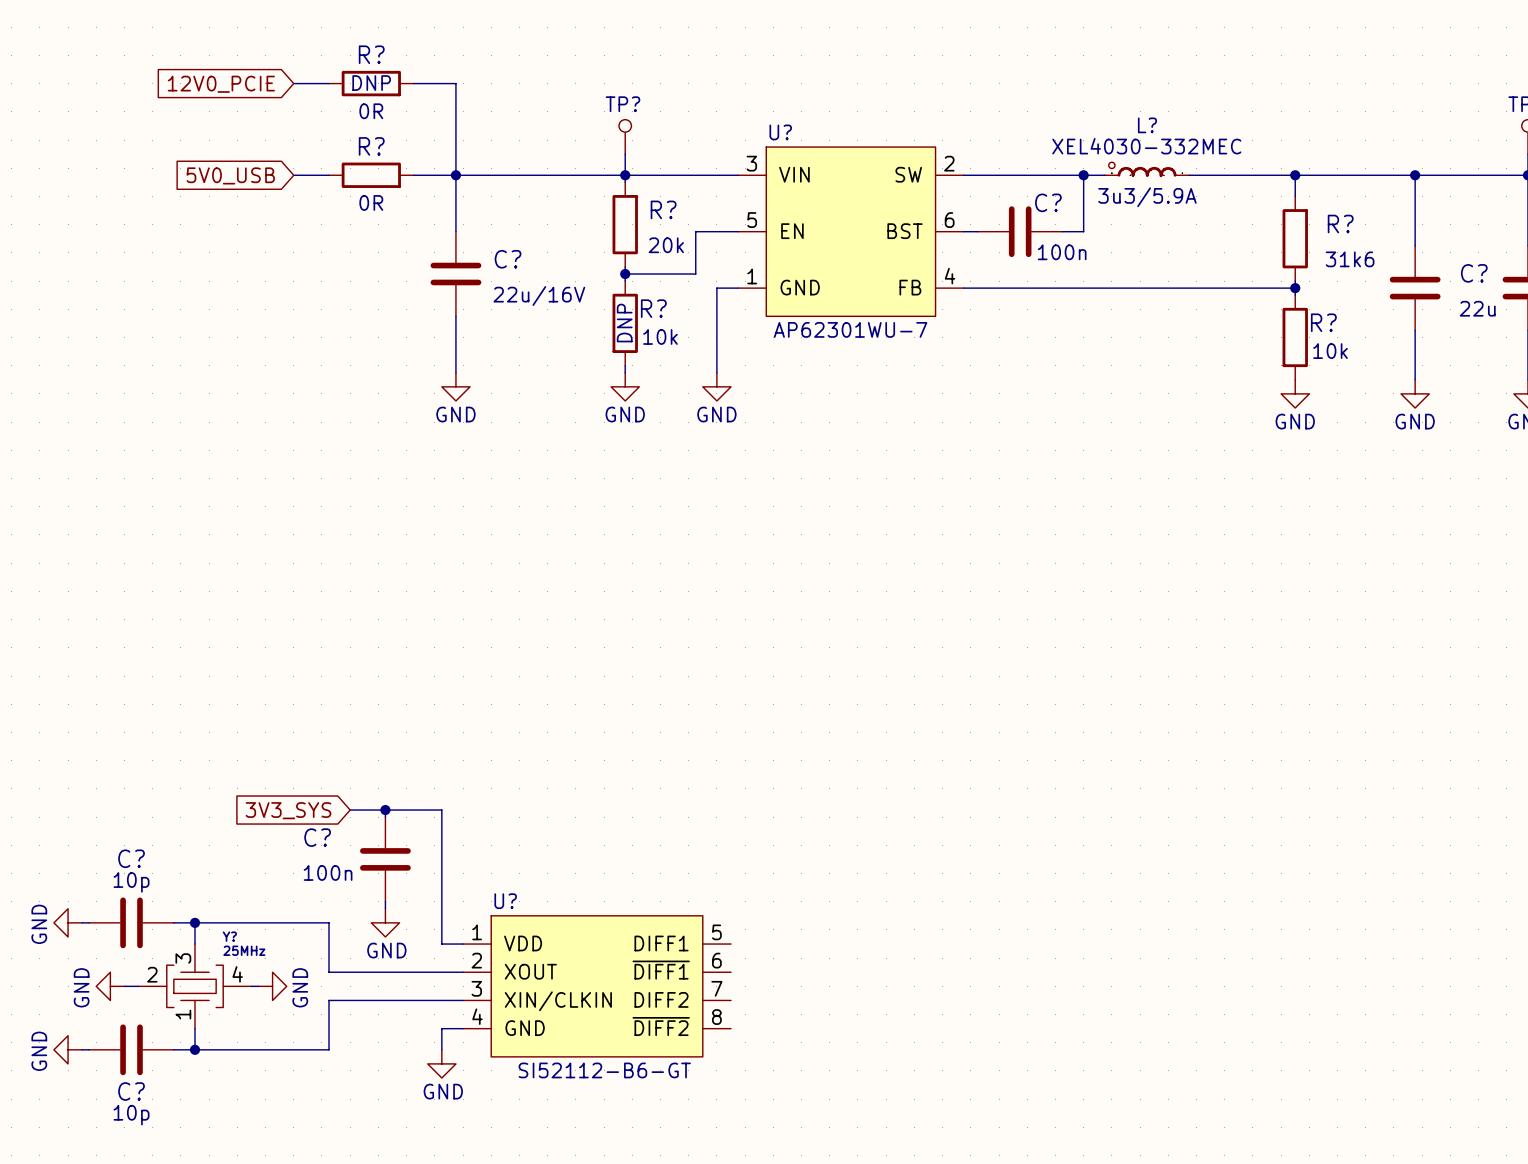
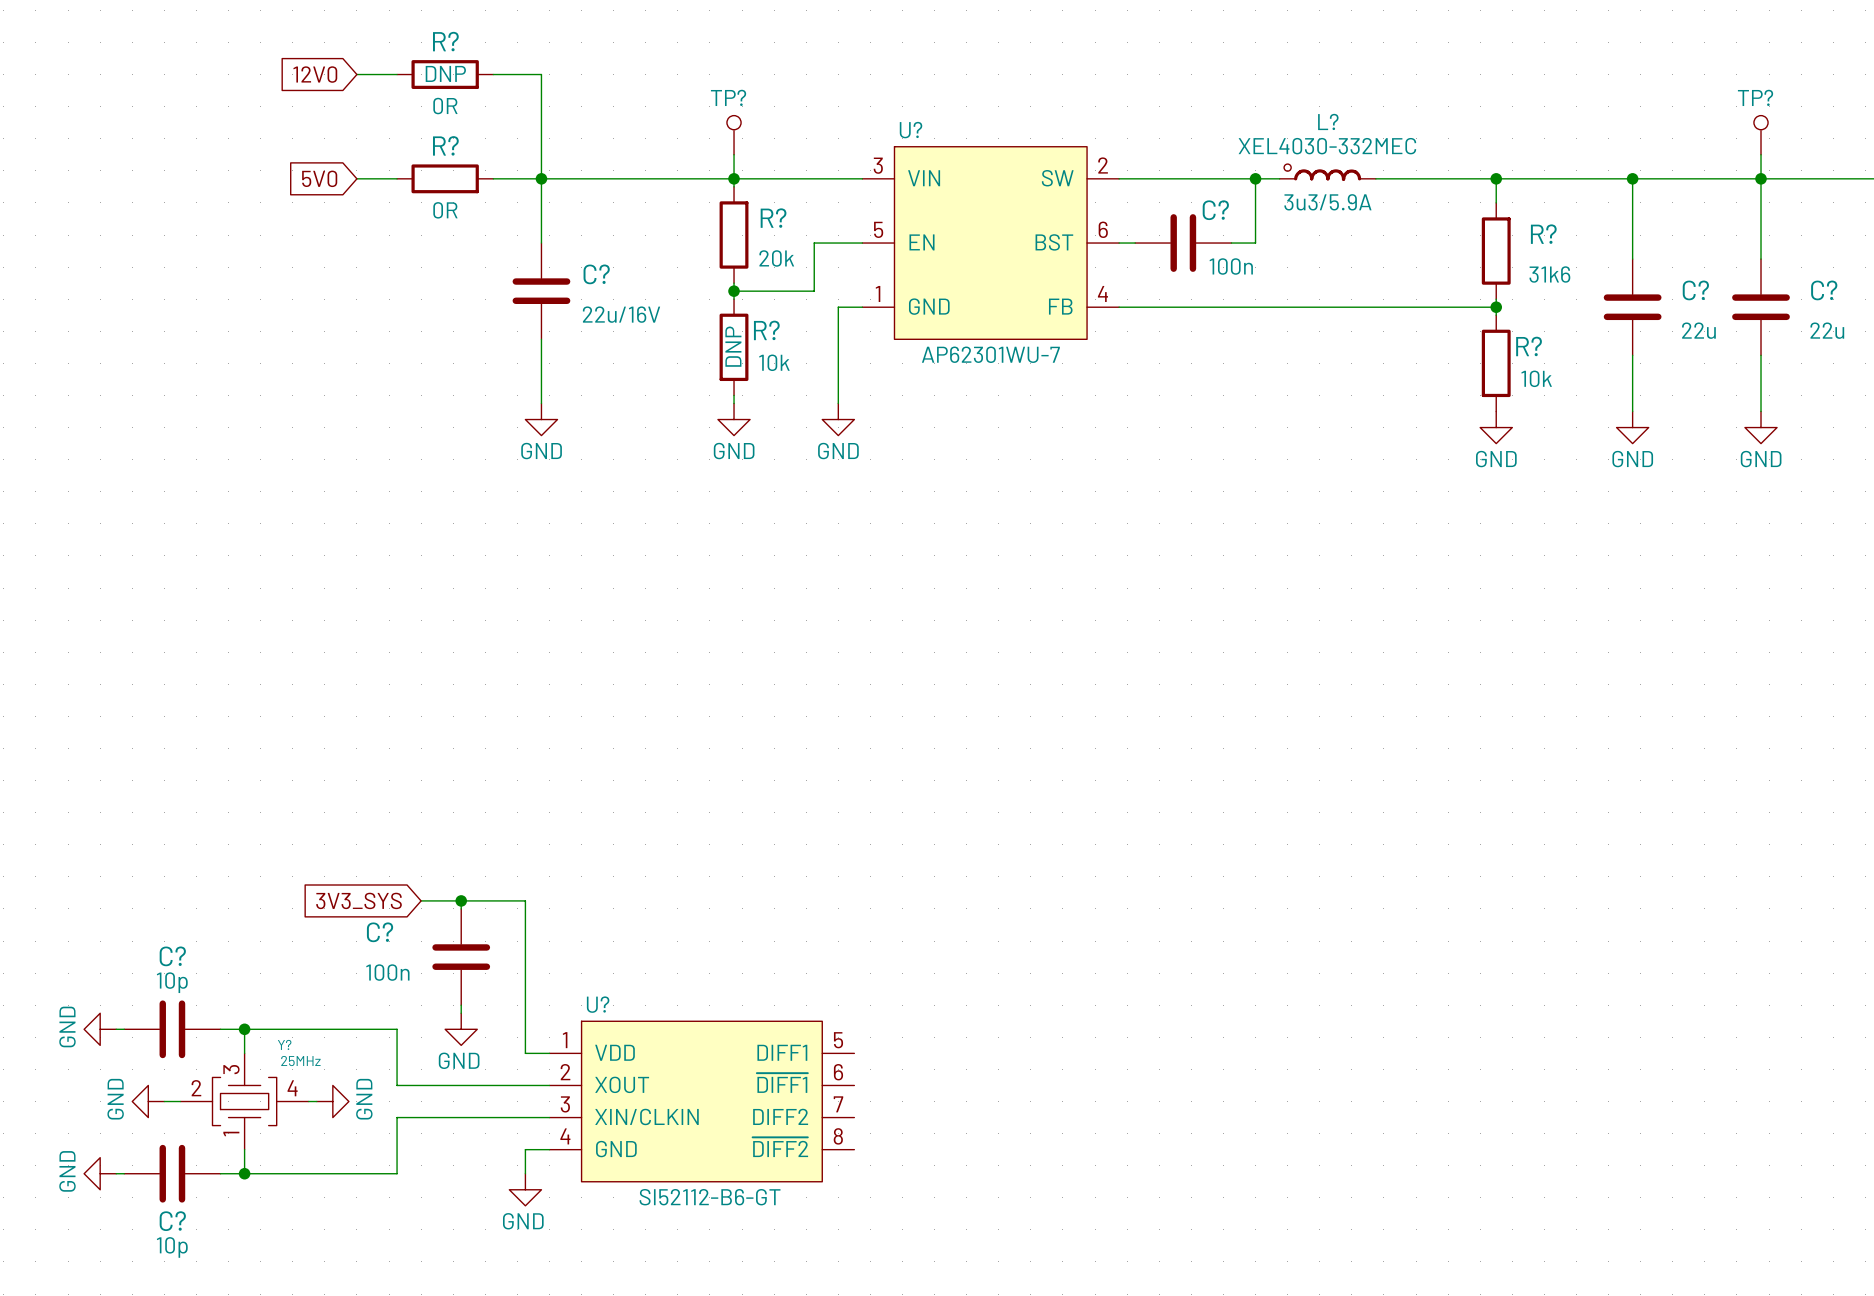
global label: 12V0_PCIE (221, 84) -> 12V0 (315, 74)
global label: 5V0_USB (230, 175) -> 5V0 (319, 178)

